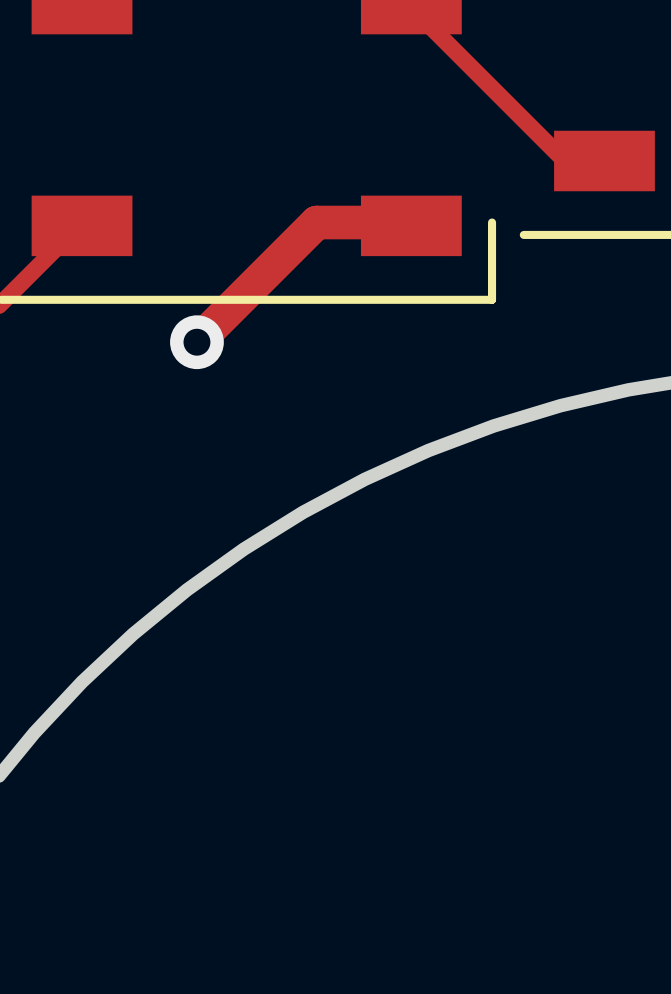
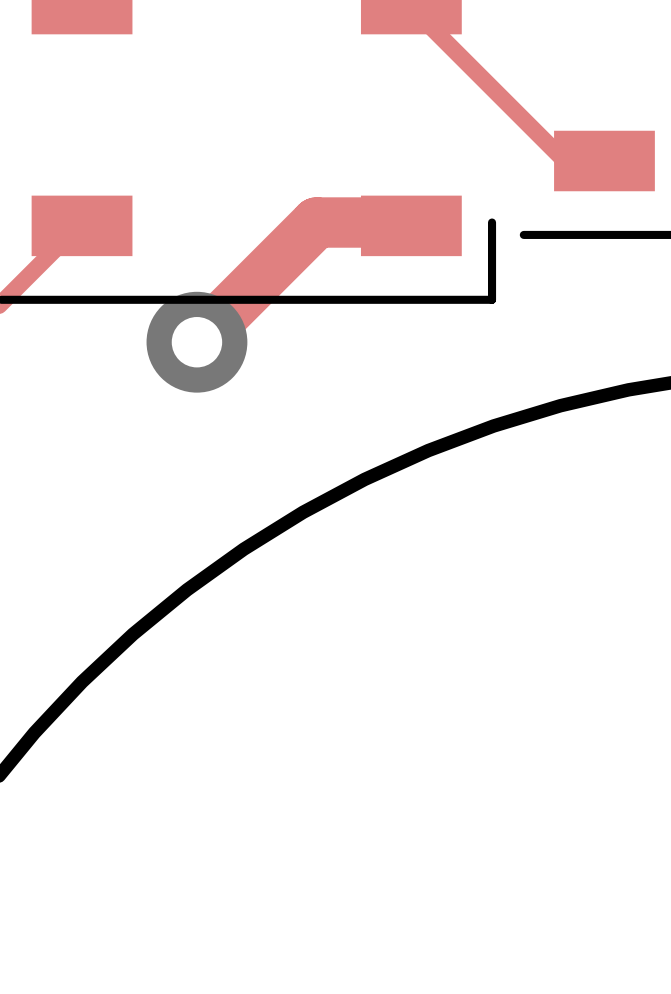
track width: thin (411, 222) (316, 222) (196, 342) -> thick (411, 222) (316, 222) (196, 342)
via size: [170, 315, 224, 370] -> [146, 291, 248, 393]

